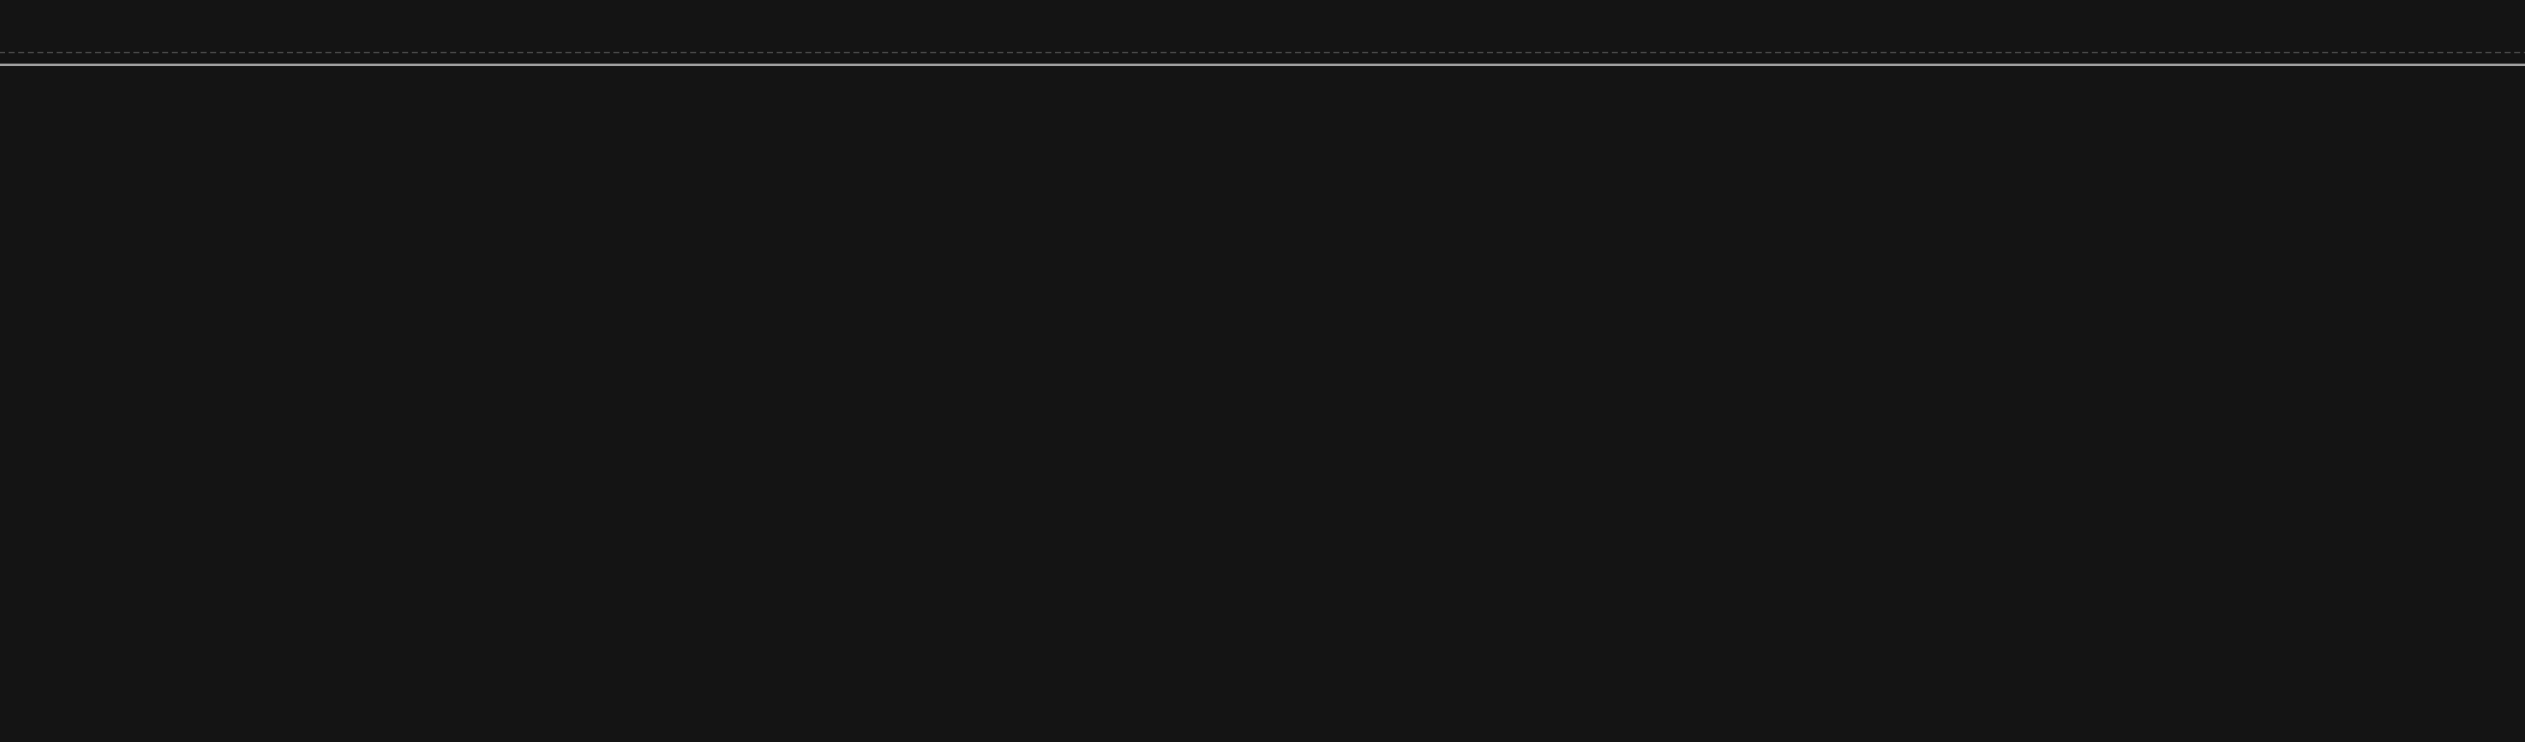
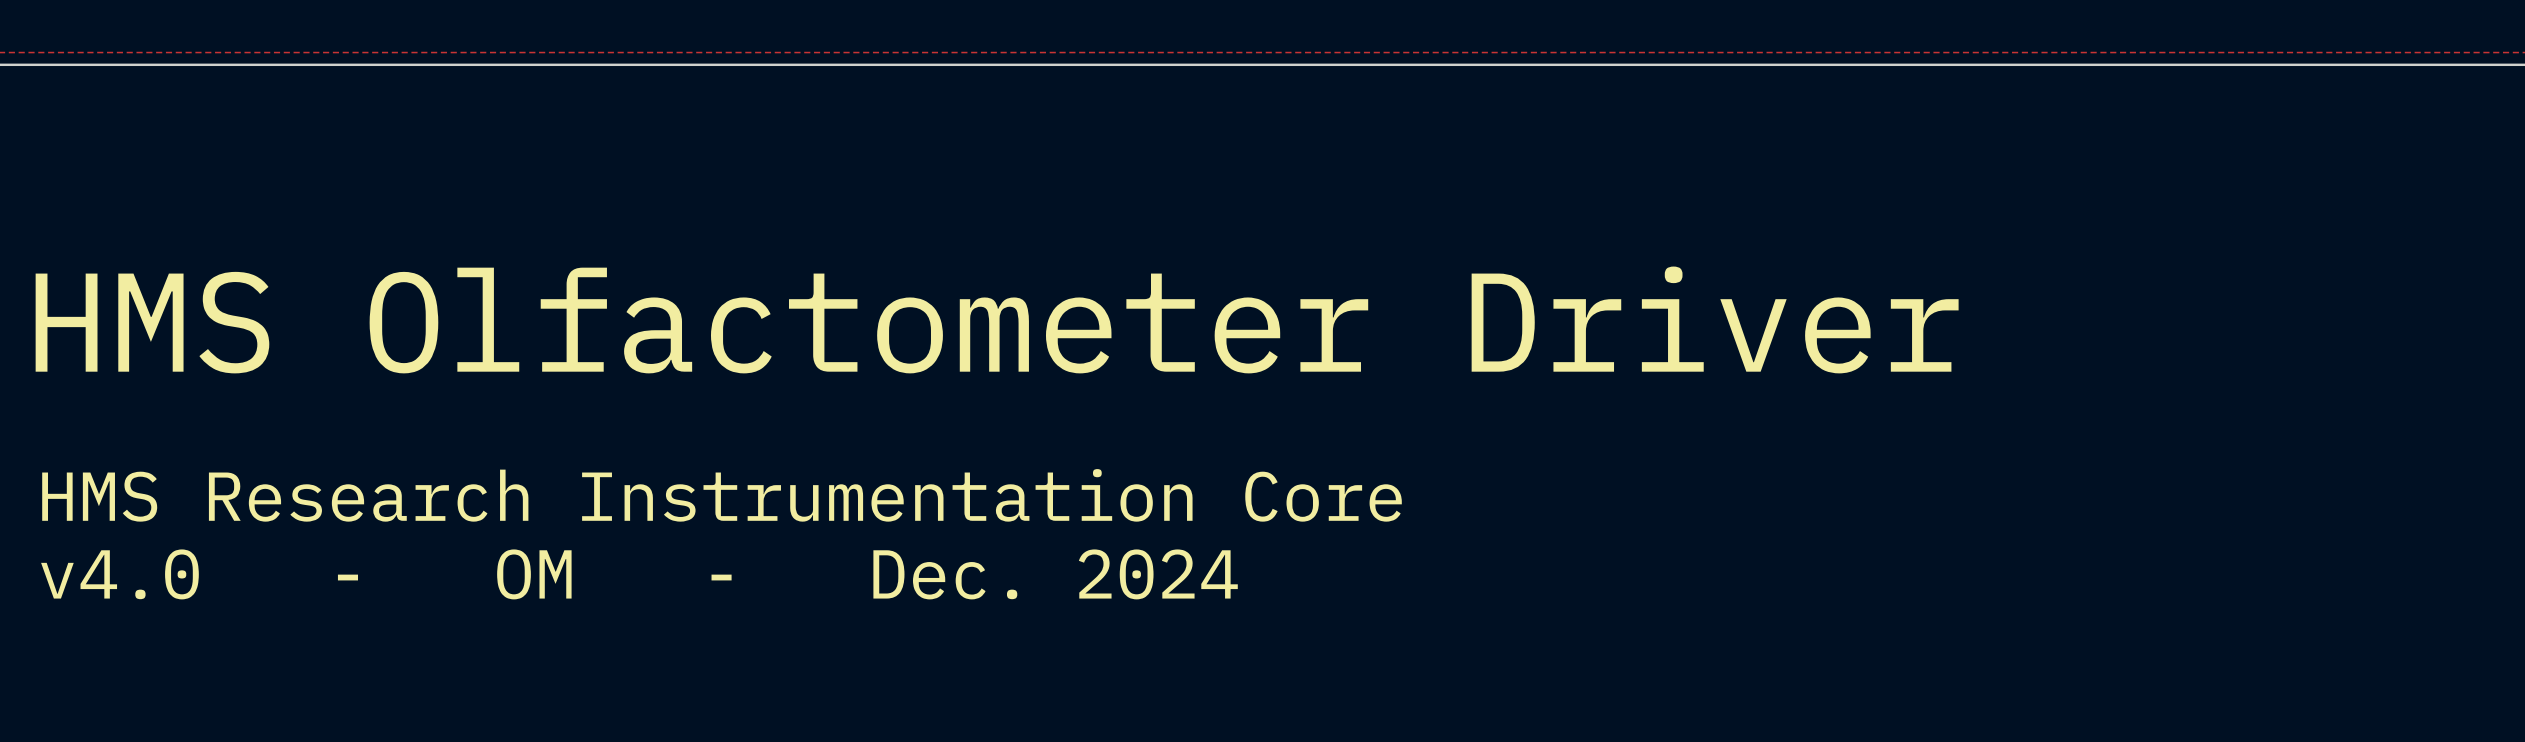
text: none -> HMS Olfactometer Driver (997, 319)
text: none -> HMS Research Instrumentation Core (722, 495)
text: none -> v4.0 - OM - Dec. 2024 (639, 574)

